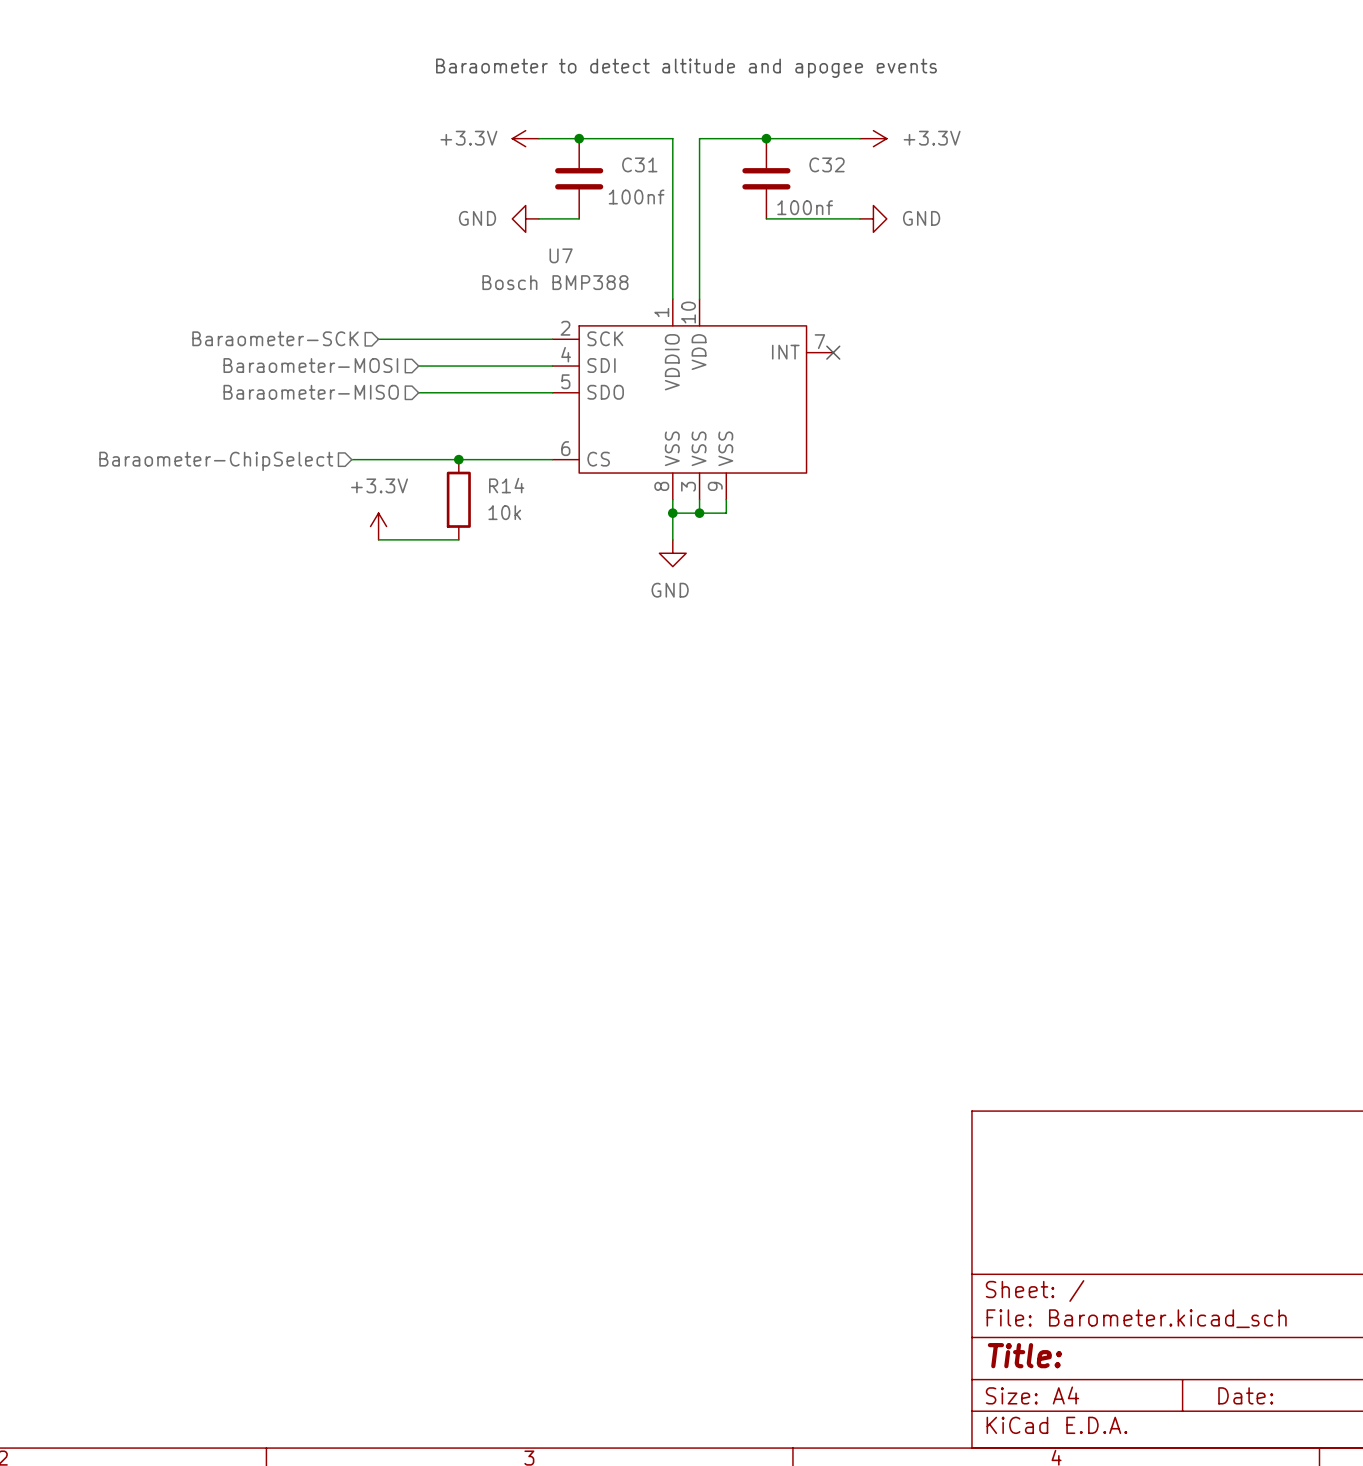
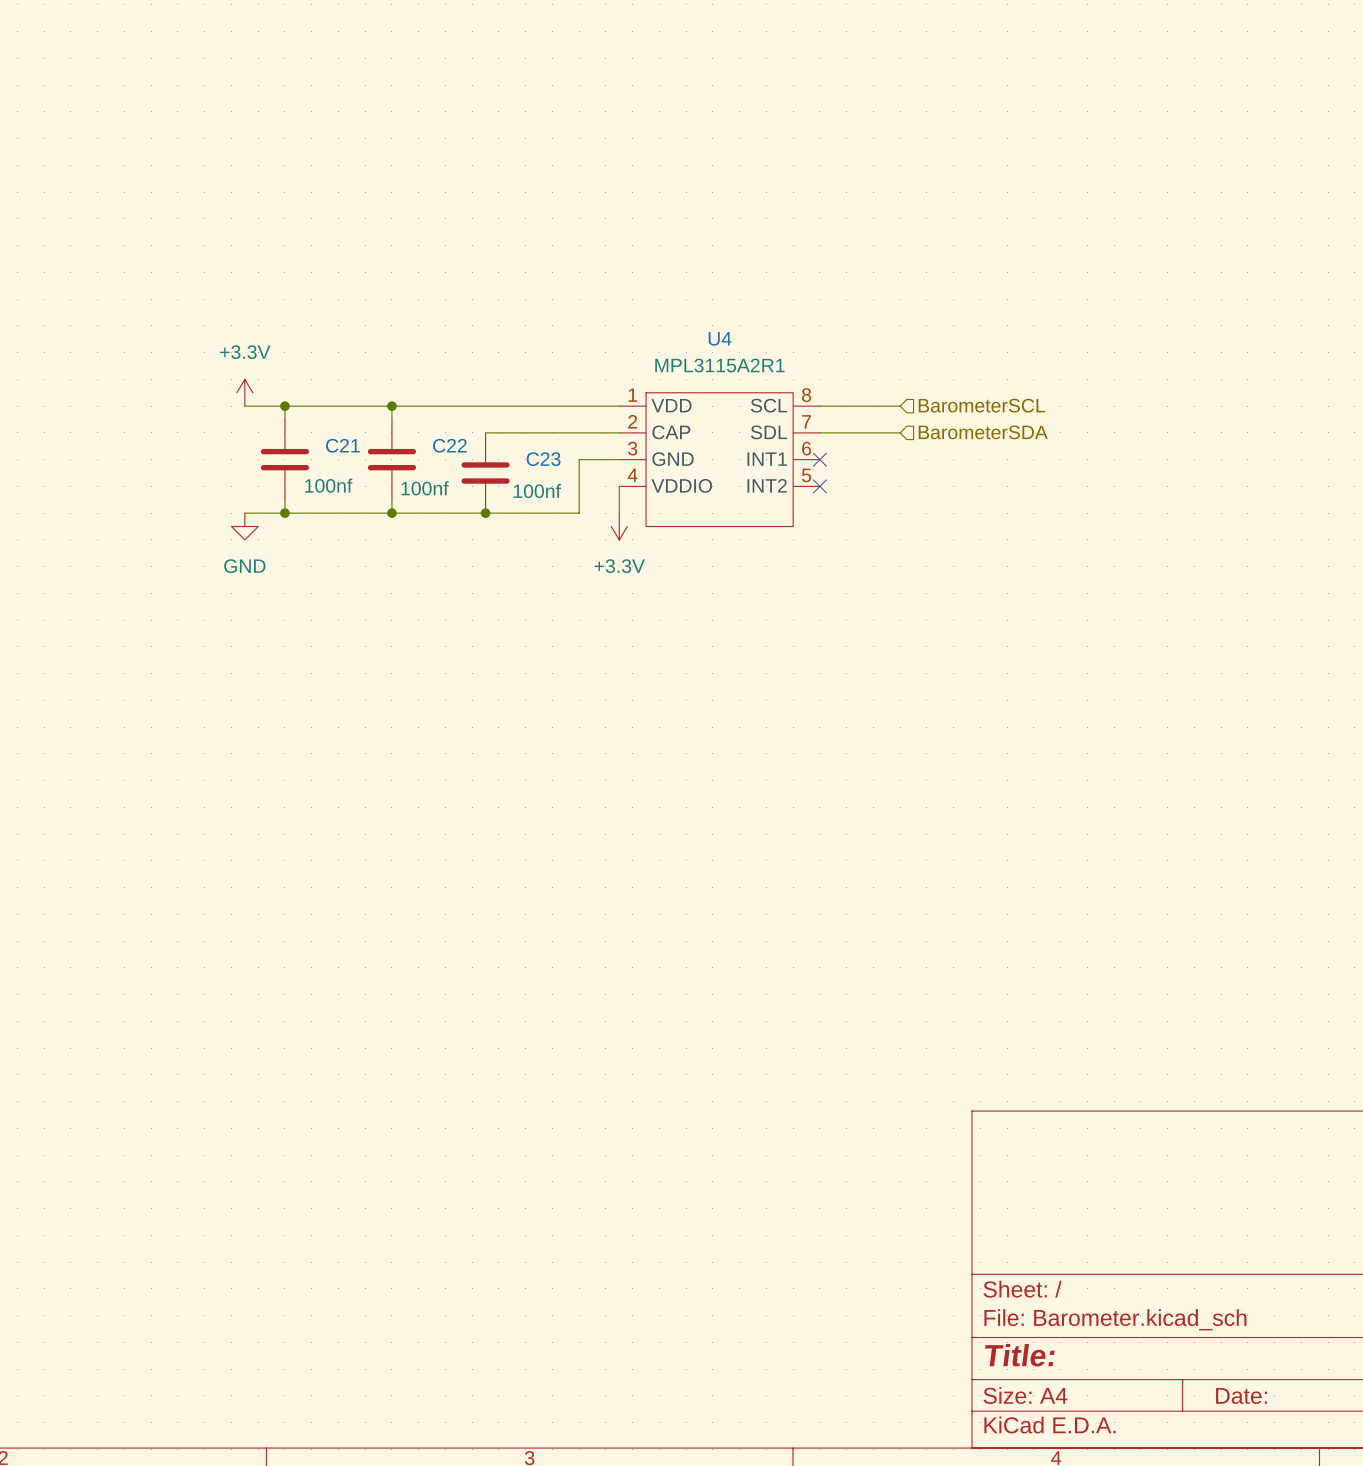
text: Baraometer to detect altitude and apogee events (686, 68) -> none
power symbol: +3.3V (525, 138) -> none
wire: (539, 138) (672, 138) (672, 299) -> none
junction: (579, 138) -> none
junction: (766, 138) -> none
wire: (860, 138) (699, 138) (699, 299) -> none
power symbol: +3.3V (873, 138) -> none
C31: 100nf (579, 178) -> none
C32: 100nf (766, 178) -> none
power symbol: GND (525, 218) -> none
wire: (539, 218) (579, 218) -> none
wire: (766, 218) (860, 218) -> none
power symbol: GND (873, 218) -> none
hierarchical label: Baraometer-SCK (275, 338) -> none
wire: (378, 339) (552, 339) -> none
no-connect mark: (833, 352) -> none
hierarchical label: Baraometer-MOSI (310, 365) -> none
wire: (418, 366) (552, 366) -> none
power symbol: none -> +3.3V (244, 392)
hierarchical label: Baraometer-MISO (311, 392) -> none
wire: (418, 392) (552, 392) -> (485, 432) (619, 432)
U7: Bosch BMP388 (692, 399) -> none
hierarchical label: none -> BarometerSCL (981, 405)
wire: none -> (244, 406) (619, 406)
wire: none -> (284, 406) (284, 419)
junction: none -> (284, 406)
wire: none -> (391, 406) (391, 419)
junction: none -> (391, 406)
wire: none -> (819, 406) (900, 406)
wire: none -> (819, 432) (900, 432)
hierarchical label: none -> BarometerSDA (983, 432)
C21: none -> 100nf (284, 459)
wire: (351, 459) (552, 459) -> none
C22: none -> 100nf (391, 459)
junction: (458, 459) -> none
wire: none -> (619, 459) (579, 459) (579, 513) (244, 513)
U4: none -> MPL3115A2R1 (719, 459)
no-connect mark: none -> (819, 459)
hierarchical label: Baraometer-ChipSelect (216, 461) -> none
C23: none -> 100nf (485, 473)
wire: none -> (619, 486) (619, 513)
no-connect mark: none -> (819, 486)
wire: none -> (284, 499) (284, 513)
wire: none -> (391, 499) (391, 513)
R14: 10k (458, 499) -> none
wire: (672, 499) (672, 539) -> none
wire: (699, 499) (699, 513) -> none
wire: (726, 499) (726, 513) (672, 513) -> none
junction: none -> (284, 513)
junction: none -> (391, 513)
junction: none -> (485, 513)
junction: (672, 513) -> none
junction: (699, 513) -> none
power symbol: none -> GND (244, 526)
power symbol: +3.3V (378, 526) -> none
power symbol: none -> +3.3V (619, 526)
wire: (378, 539) (458, 539) -> none
power symbol: GND (672, 553) -> none

